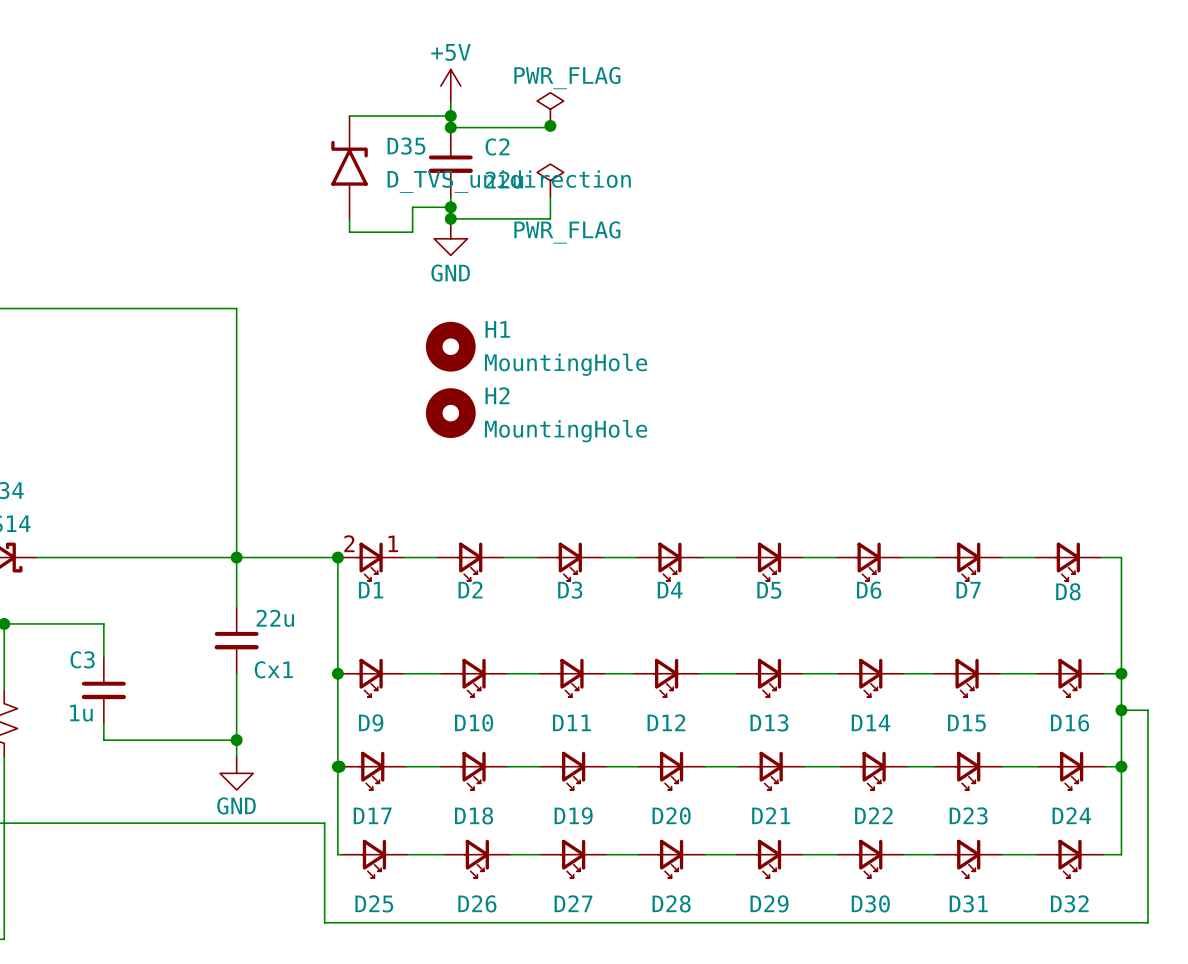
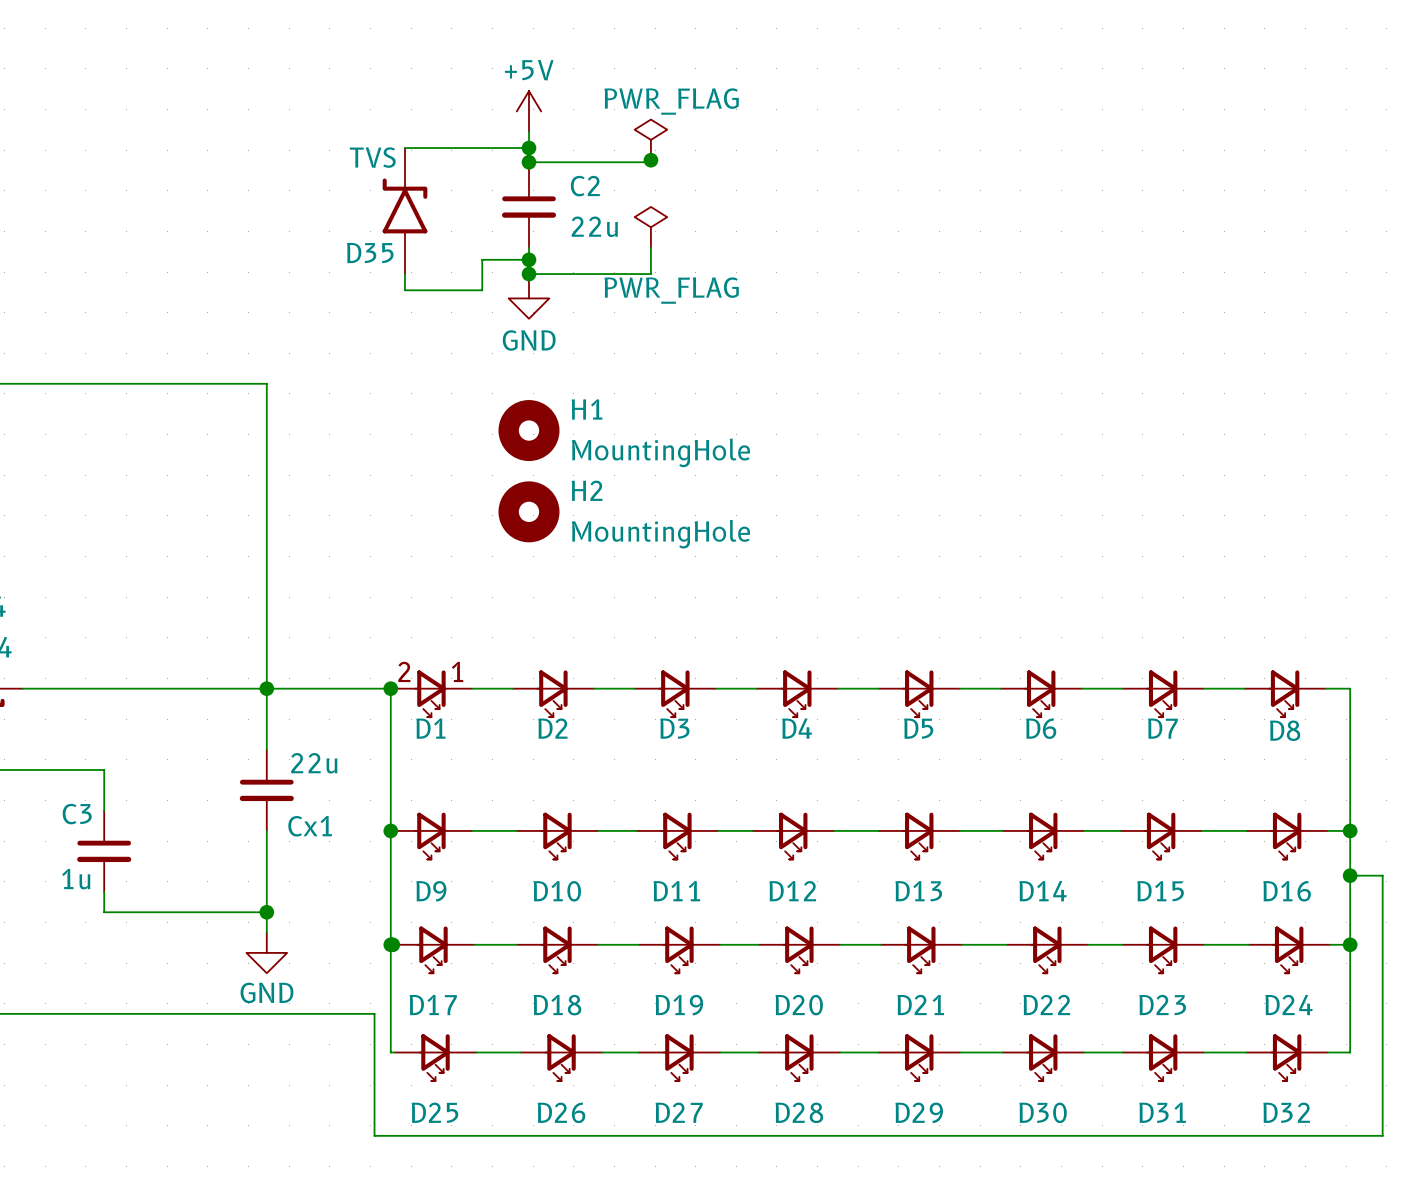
D35 name position: D35 (406, 146) -> D35 (370, 253)
D35 value: D_TVS_unidirection (509, 181) -> TVS (372, 157)

